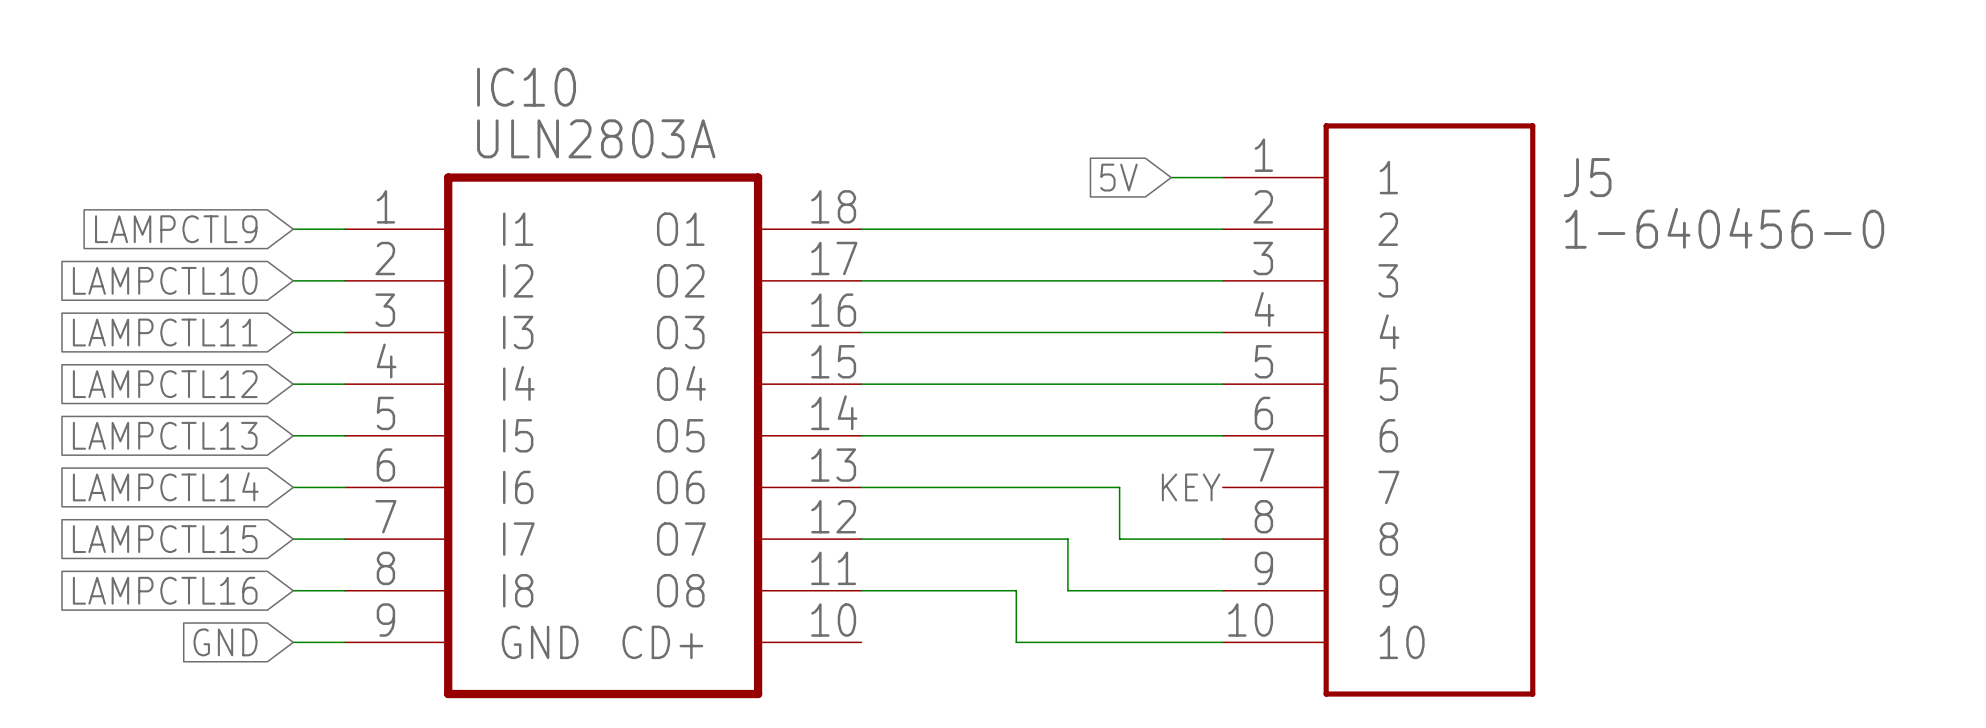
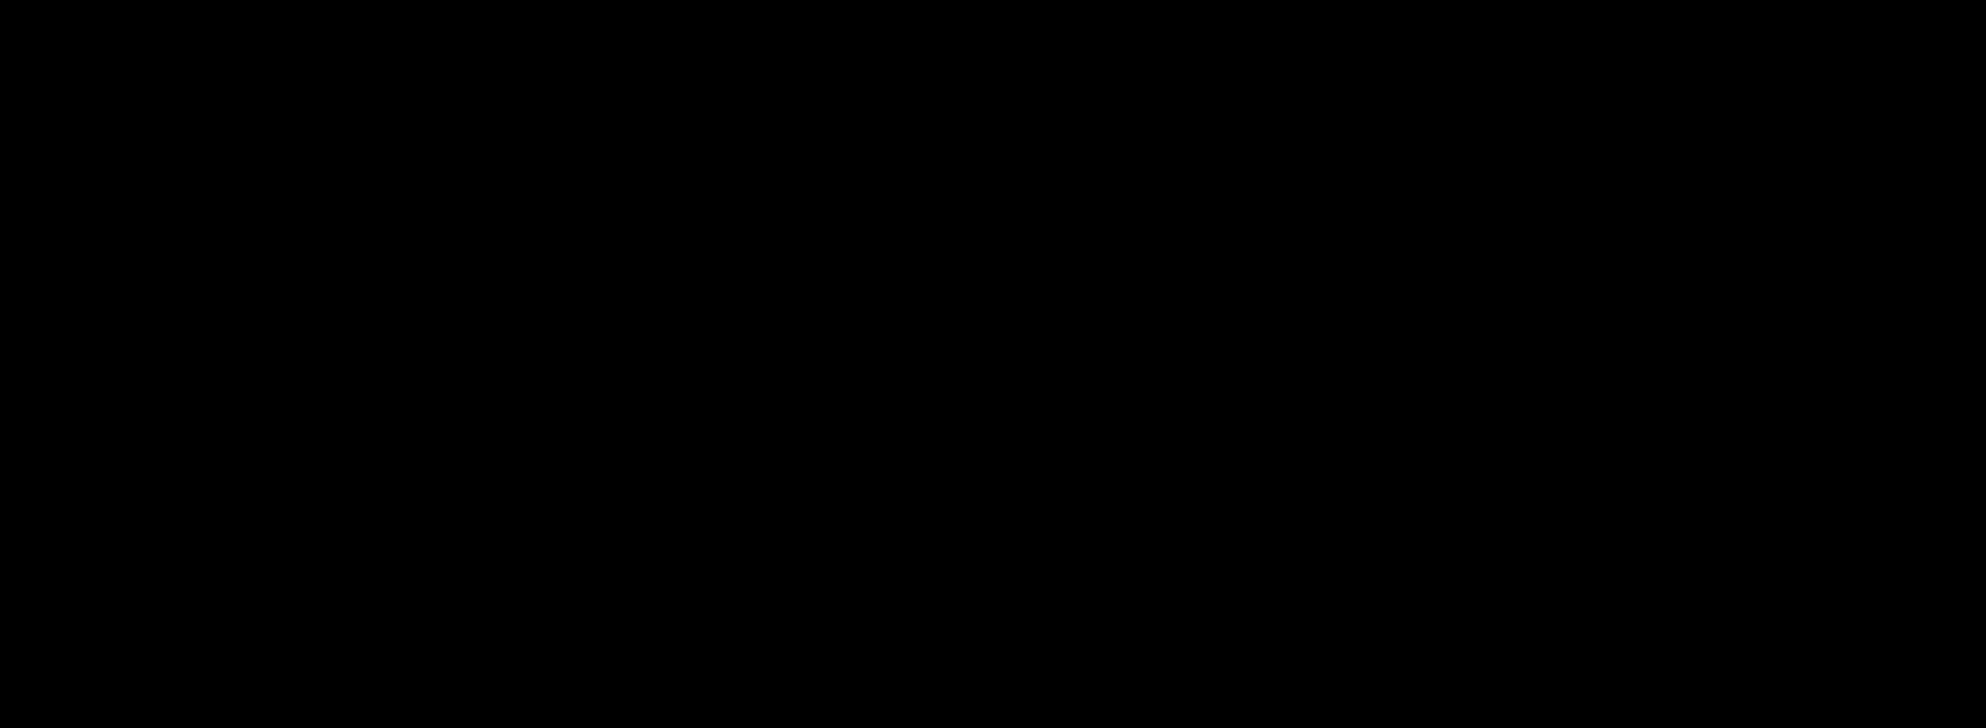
global label: 5V (1118, 177) -> none
wire: (1171, 177) (1222, 177) -> none
global label: LAMPCTL9 (176, 229) -> none
wire: (293, 229) (344, 229) -> none
wire: (861, 229) (1222, 229) -> none
global label: LAMPCTL10 (165, 280) -> none
wire: (293, 280) (344, 280) -> none
wire: (861, 280) (1222, 280) -> none
global label: LAMPCTL11 (165, 332) -> none
wire: (293, 332) (344, 332) -> none
wire: (861, 332) (1222, 332) -> none
global label: LAMPCTL12 (165, 384) -> none
wire: (293, 384) (344, 384) -> none
wire: (861, 384) (1222, 384) -> none
J5: 1-640456-0 (1379, 409) -> none
global label: LAMPCTL13 (165, 435) -> none
wire: (293, 435) (344, 435) -> none
IC10: ULN2803A (603, 435) -> none
wire: (861, 435) (1222, 435) -> none
global label: LAMPCTL14 (165, 486) -> none
wire: (293, 487) (344, 487) -> none
wire: (861, 487) (1119, 487) (1119, 539) (1222, 539) -> none
text: KEY (1191, 487) -> none
global label: LAMPCTL15 (165, 539) -> none
wire: (293, 539) (344, 539) -> none
wire: (861, 539) (1067, 539) (1067, 590) (1222, 590) -> none
global label: LAMPCTL16 (165, 590) -> none
wire: (293, 590) (344, 590) -> none
wire: (861, 590) (1016, 590) (1016, 642) (1222, 642) -> none
global label: GND (225, 642) -> none
wire: (293, 642) (344, 642) -> none

